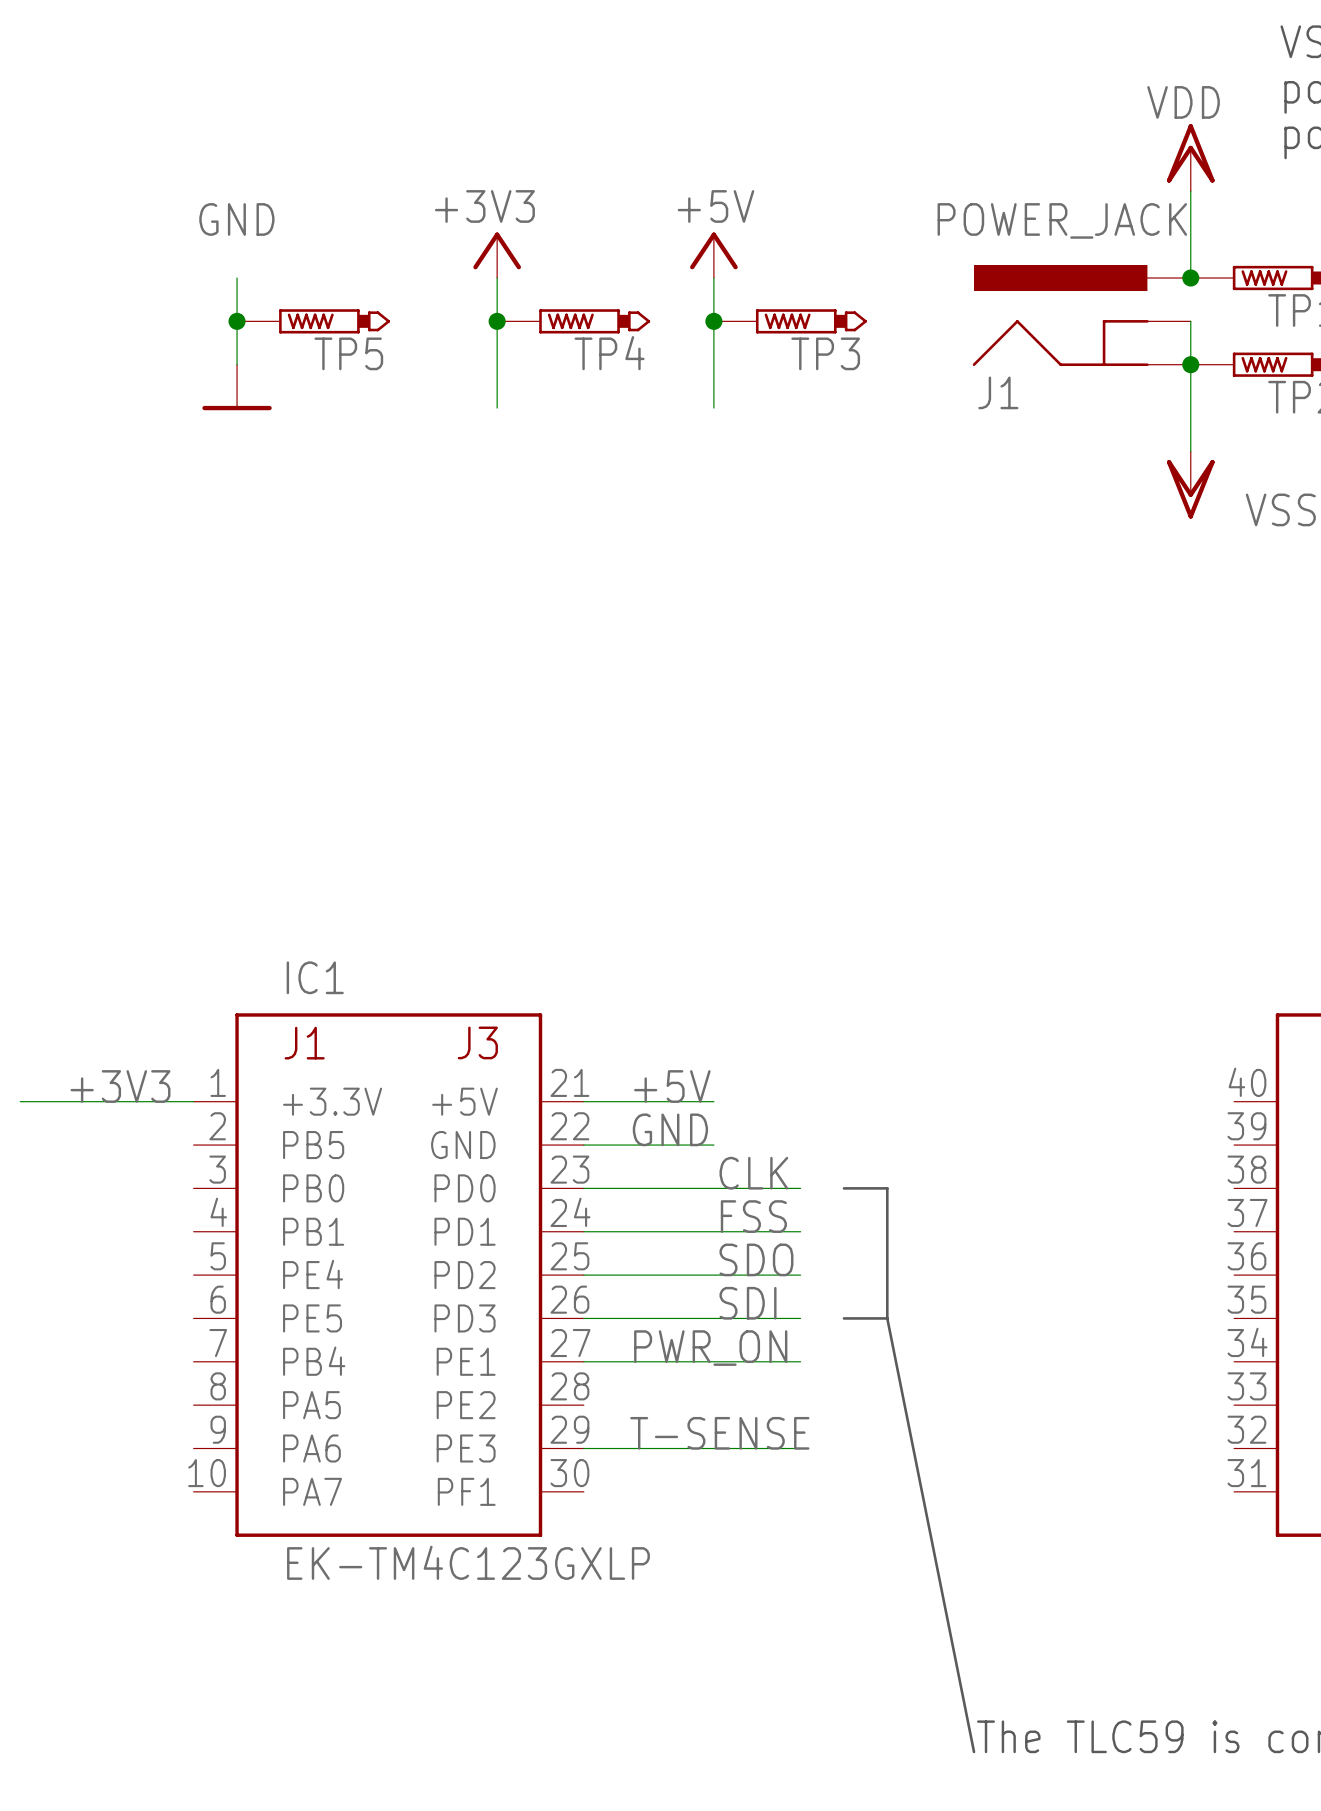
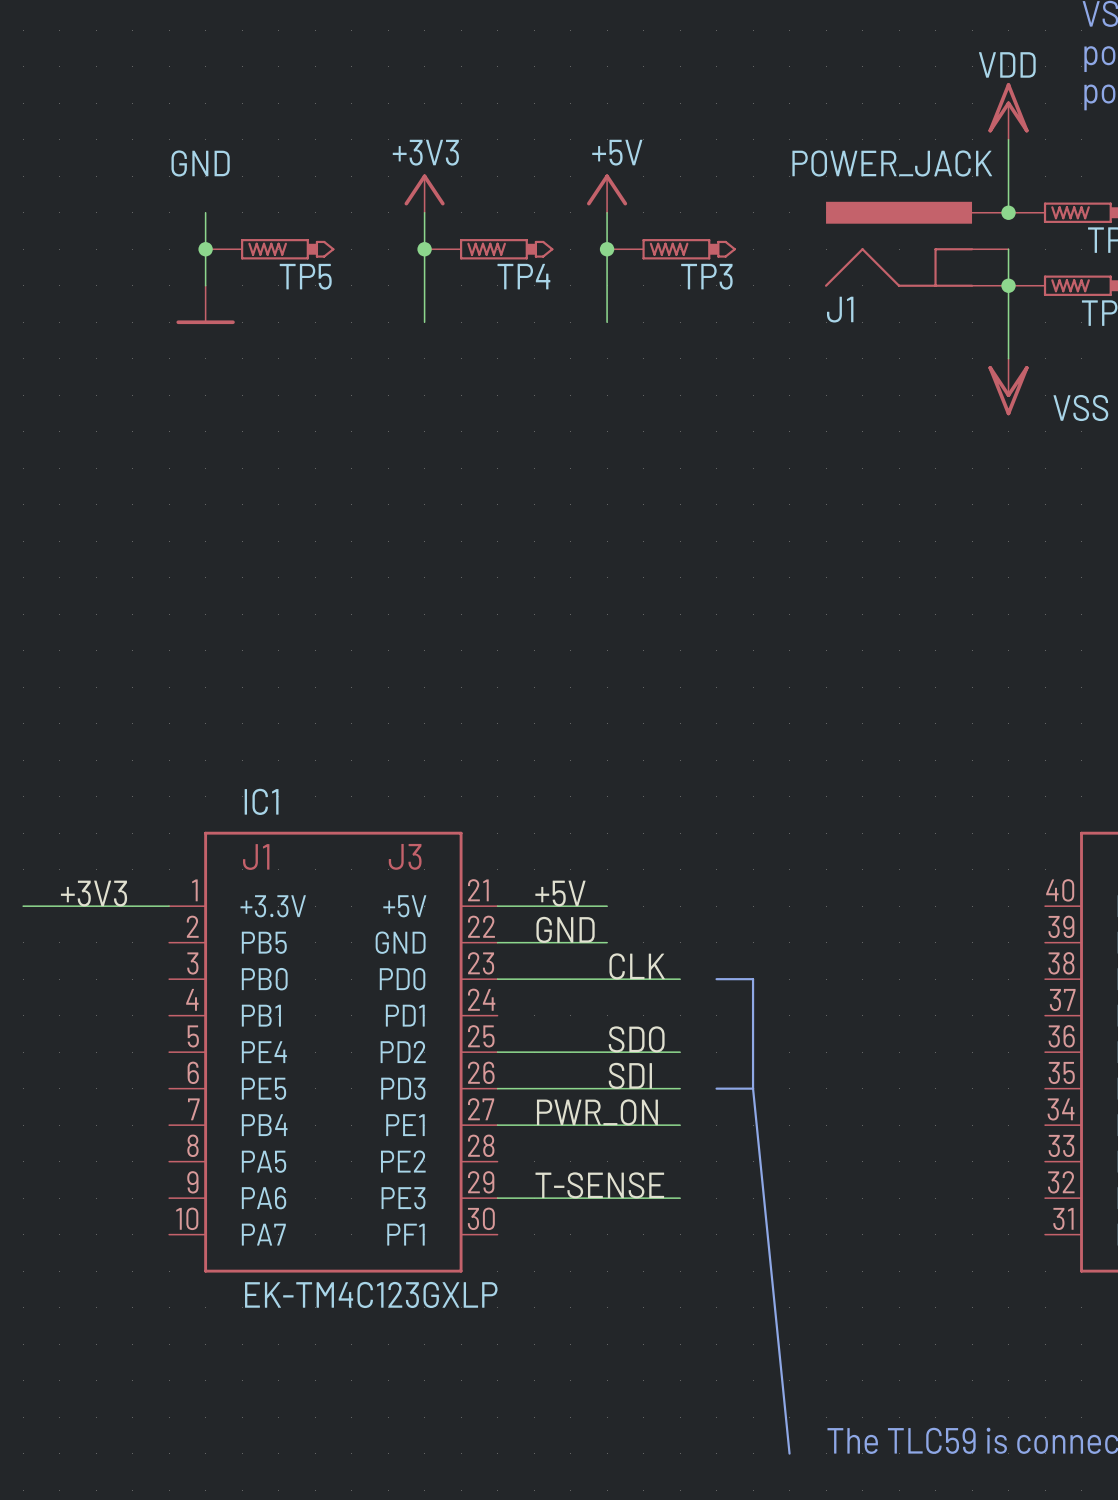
label: FSS (753, 1216) -> none
wire: (583, 1231) (800, 1231) -> none
line: (887, 1318) (974, 1751) -> (753, 1088) (789, 1453)

